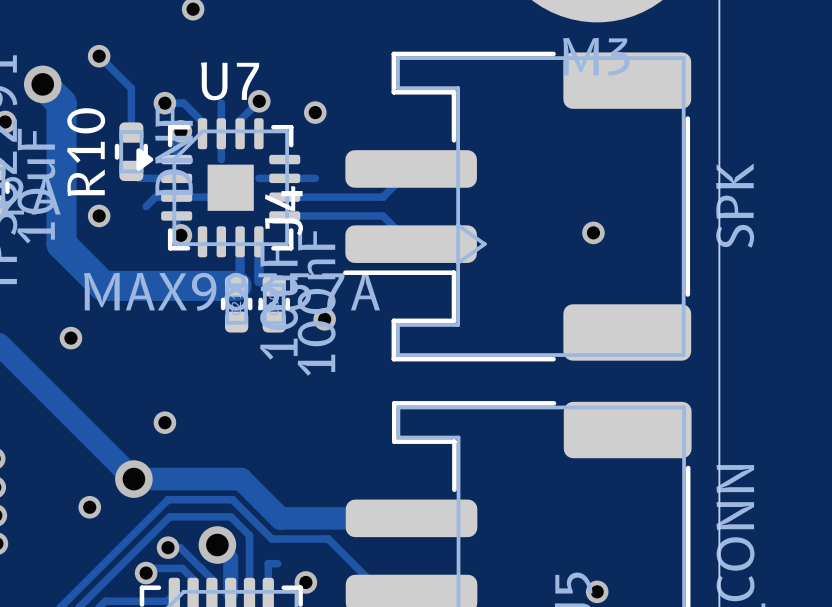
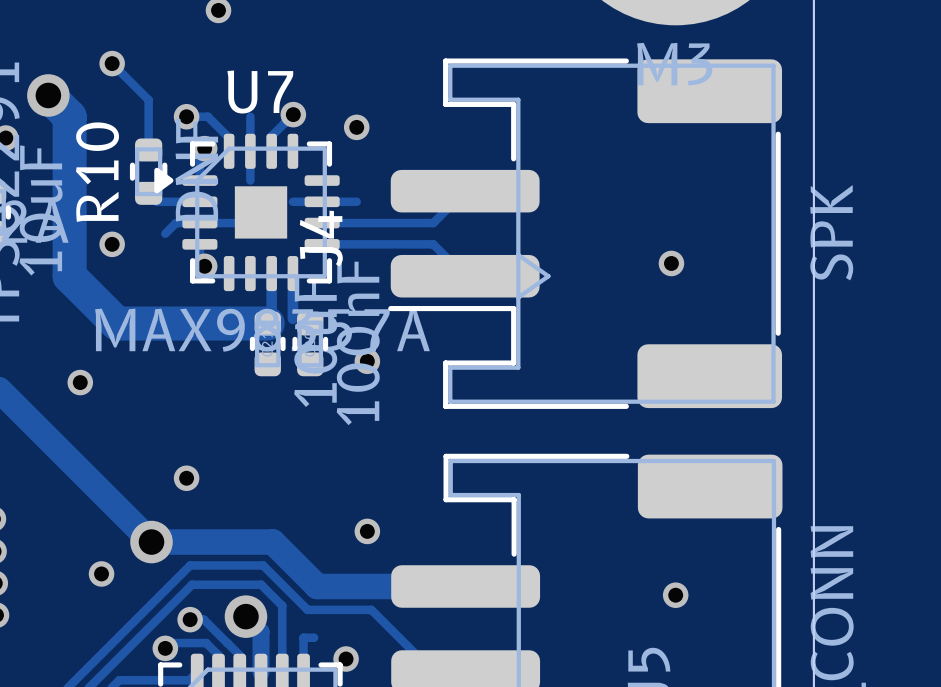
via: none -> (367, 531)
via: none -> (675, 595)
via: (597, 591) -> none

